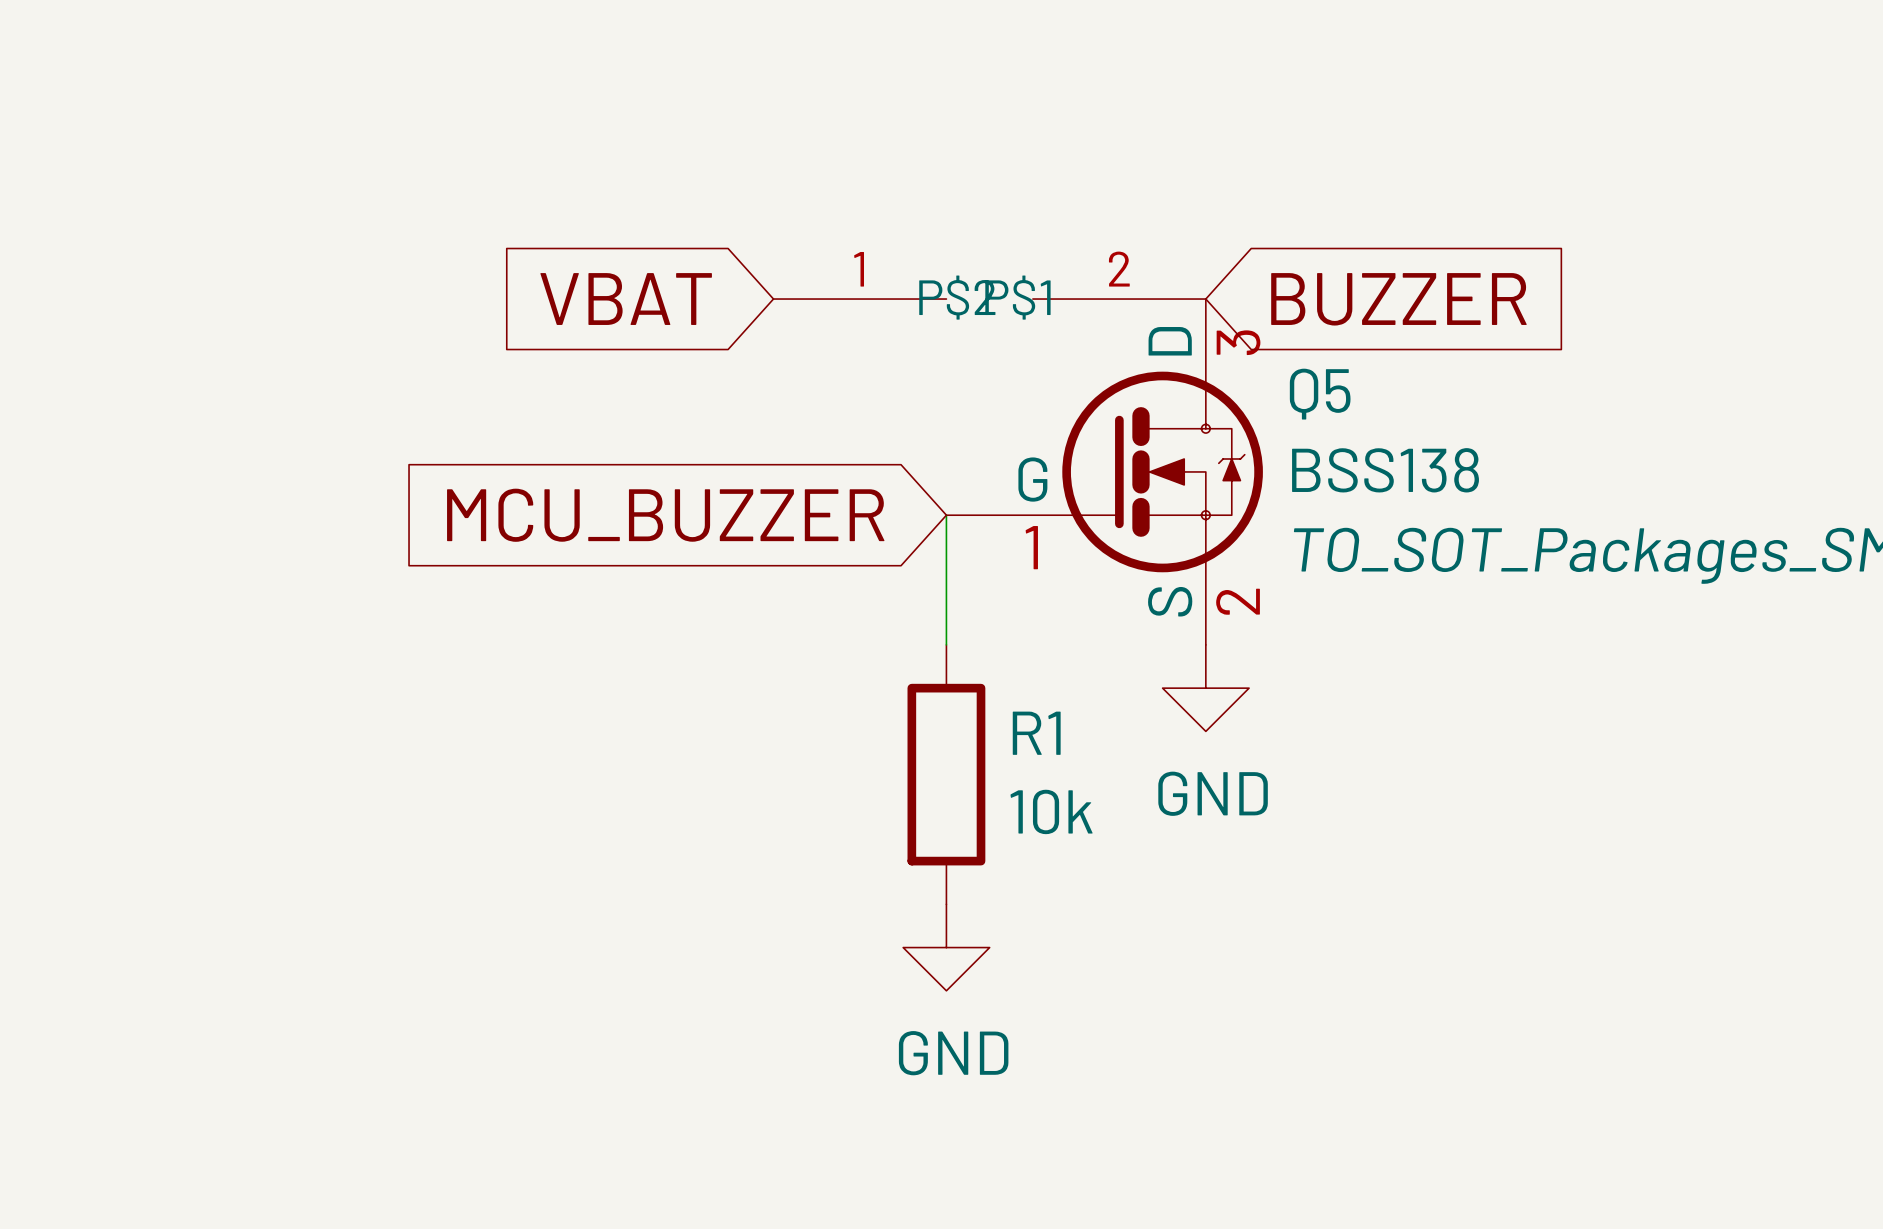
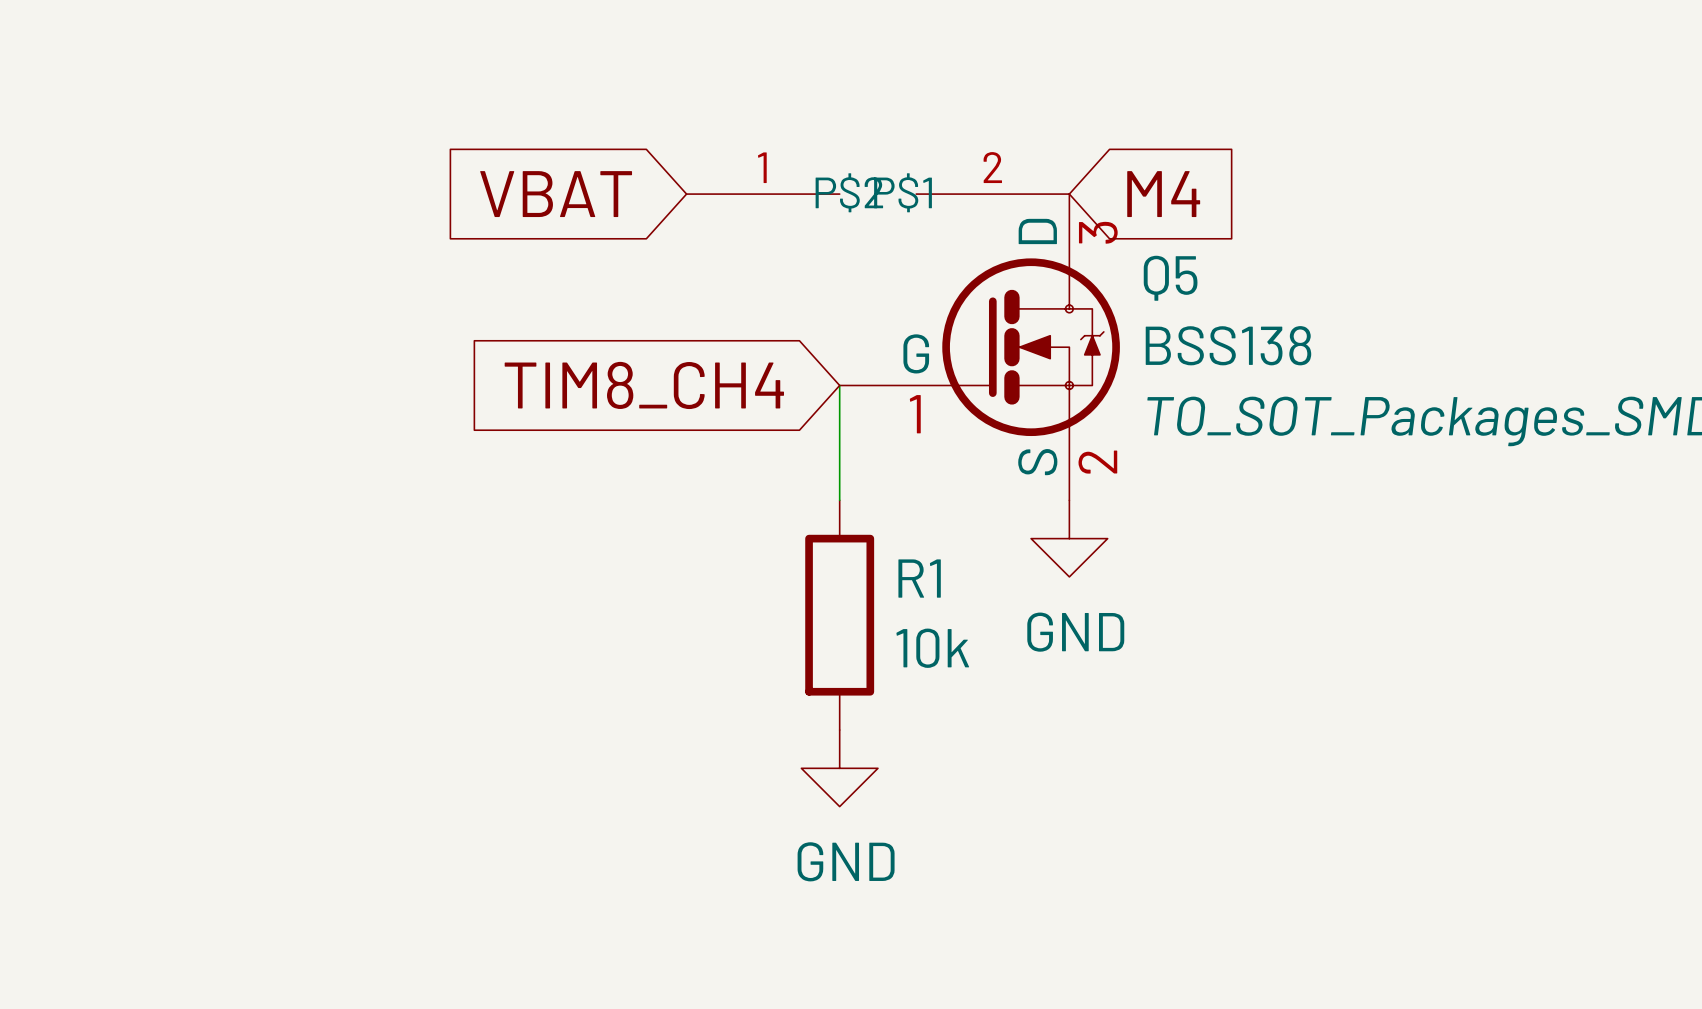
global label: BUZZER (1398, 299) -> M4 (1163, 194)
global label: MCU_BUZZER (665, 515) -> TIM8_CH4 (644, 385)

